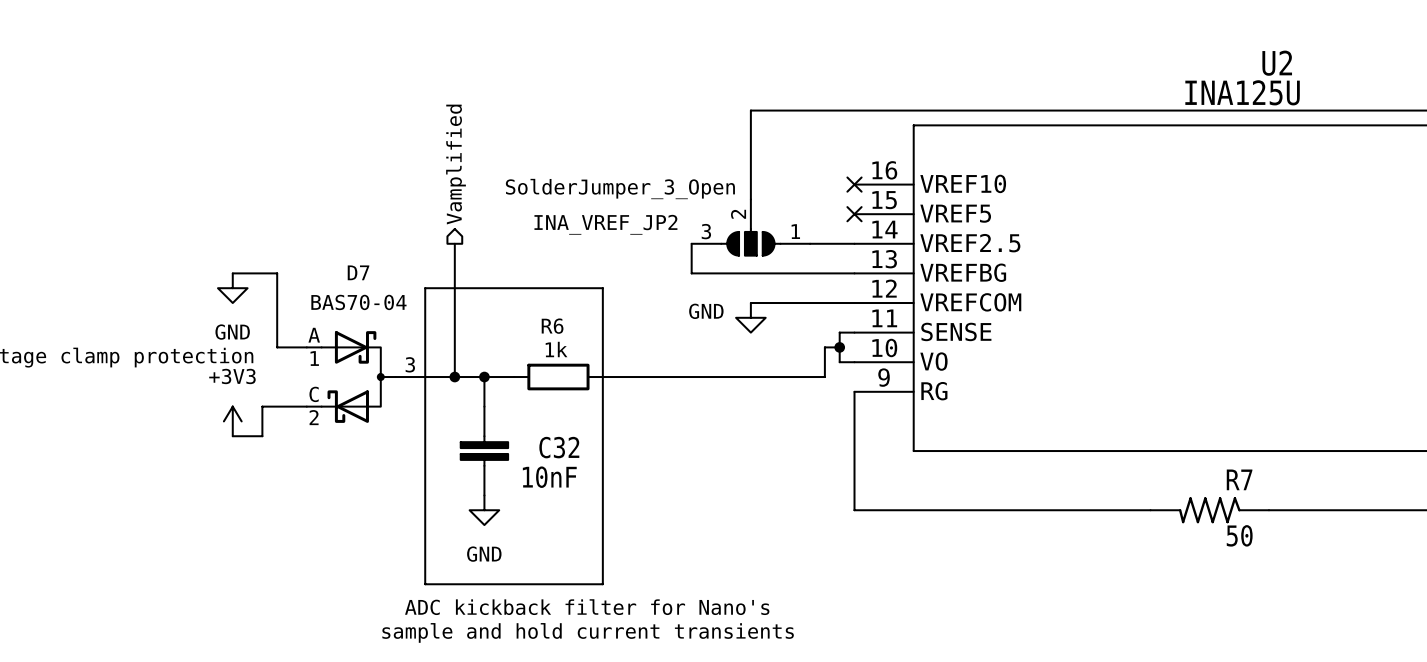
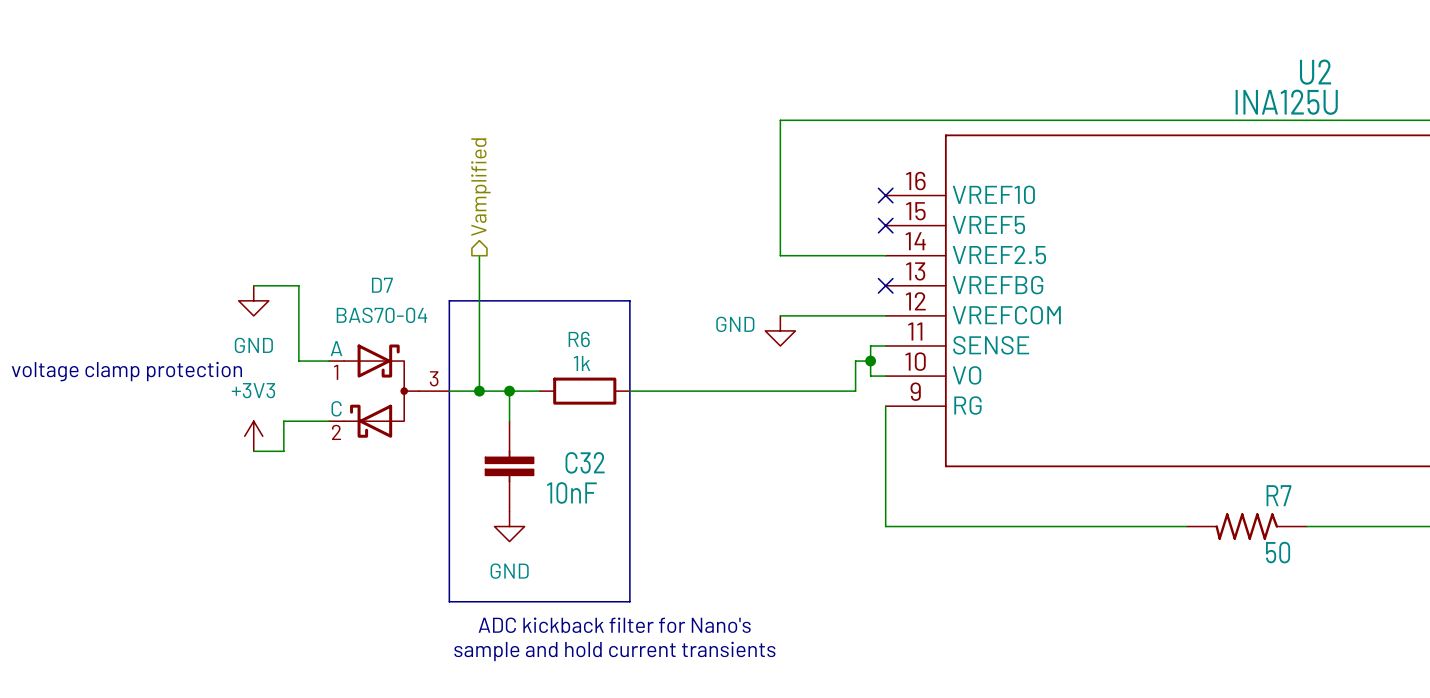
INA_VREF_JP2: SolderJumper_3_Open (750, 227) -> none
wire: (691, 243) (691, 273) (854, 273) -> none
no-connect mark: none -> (885, 285)

